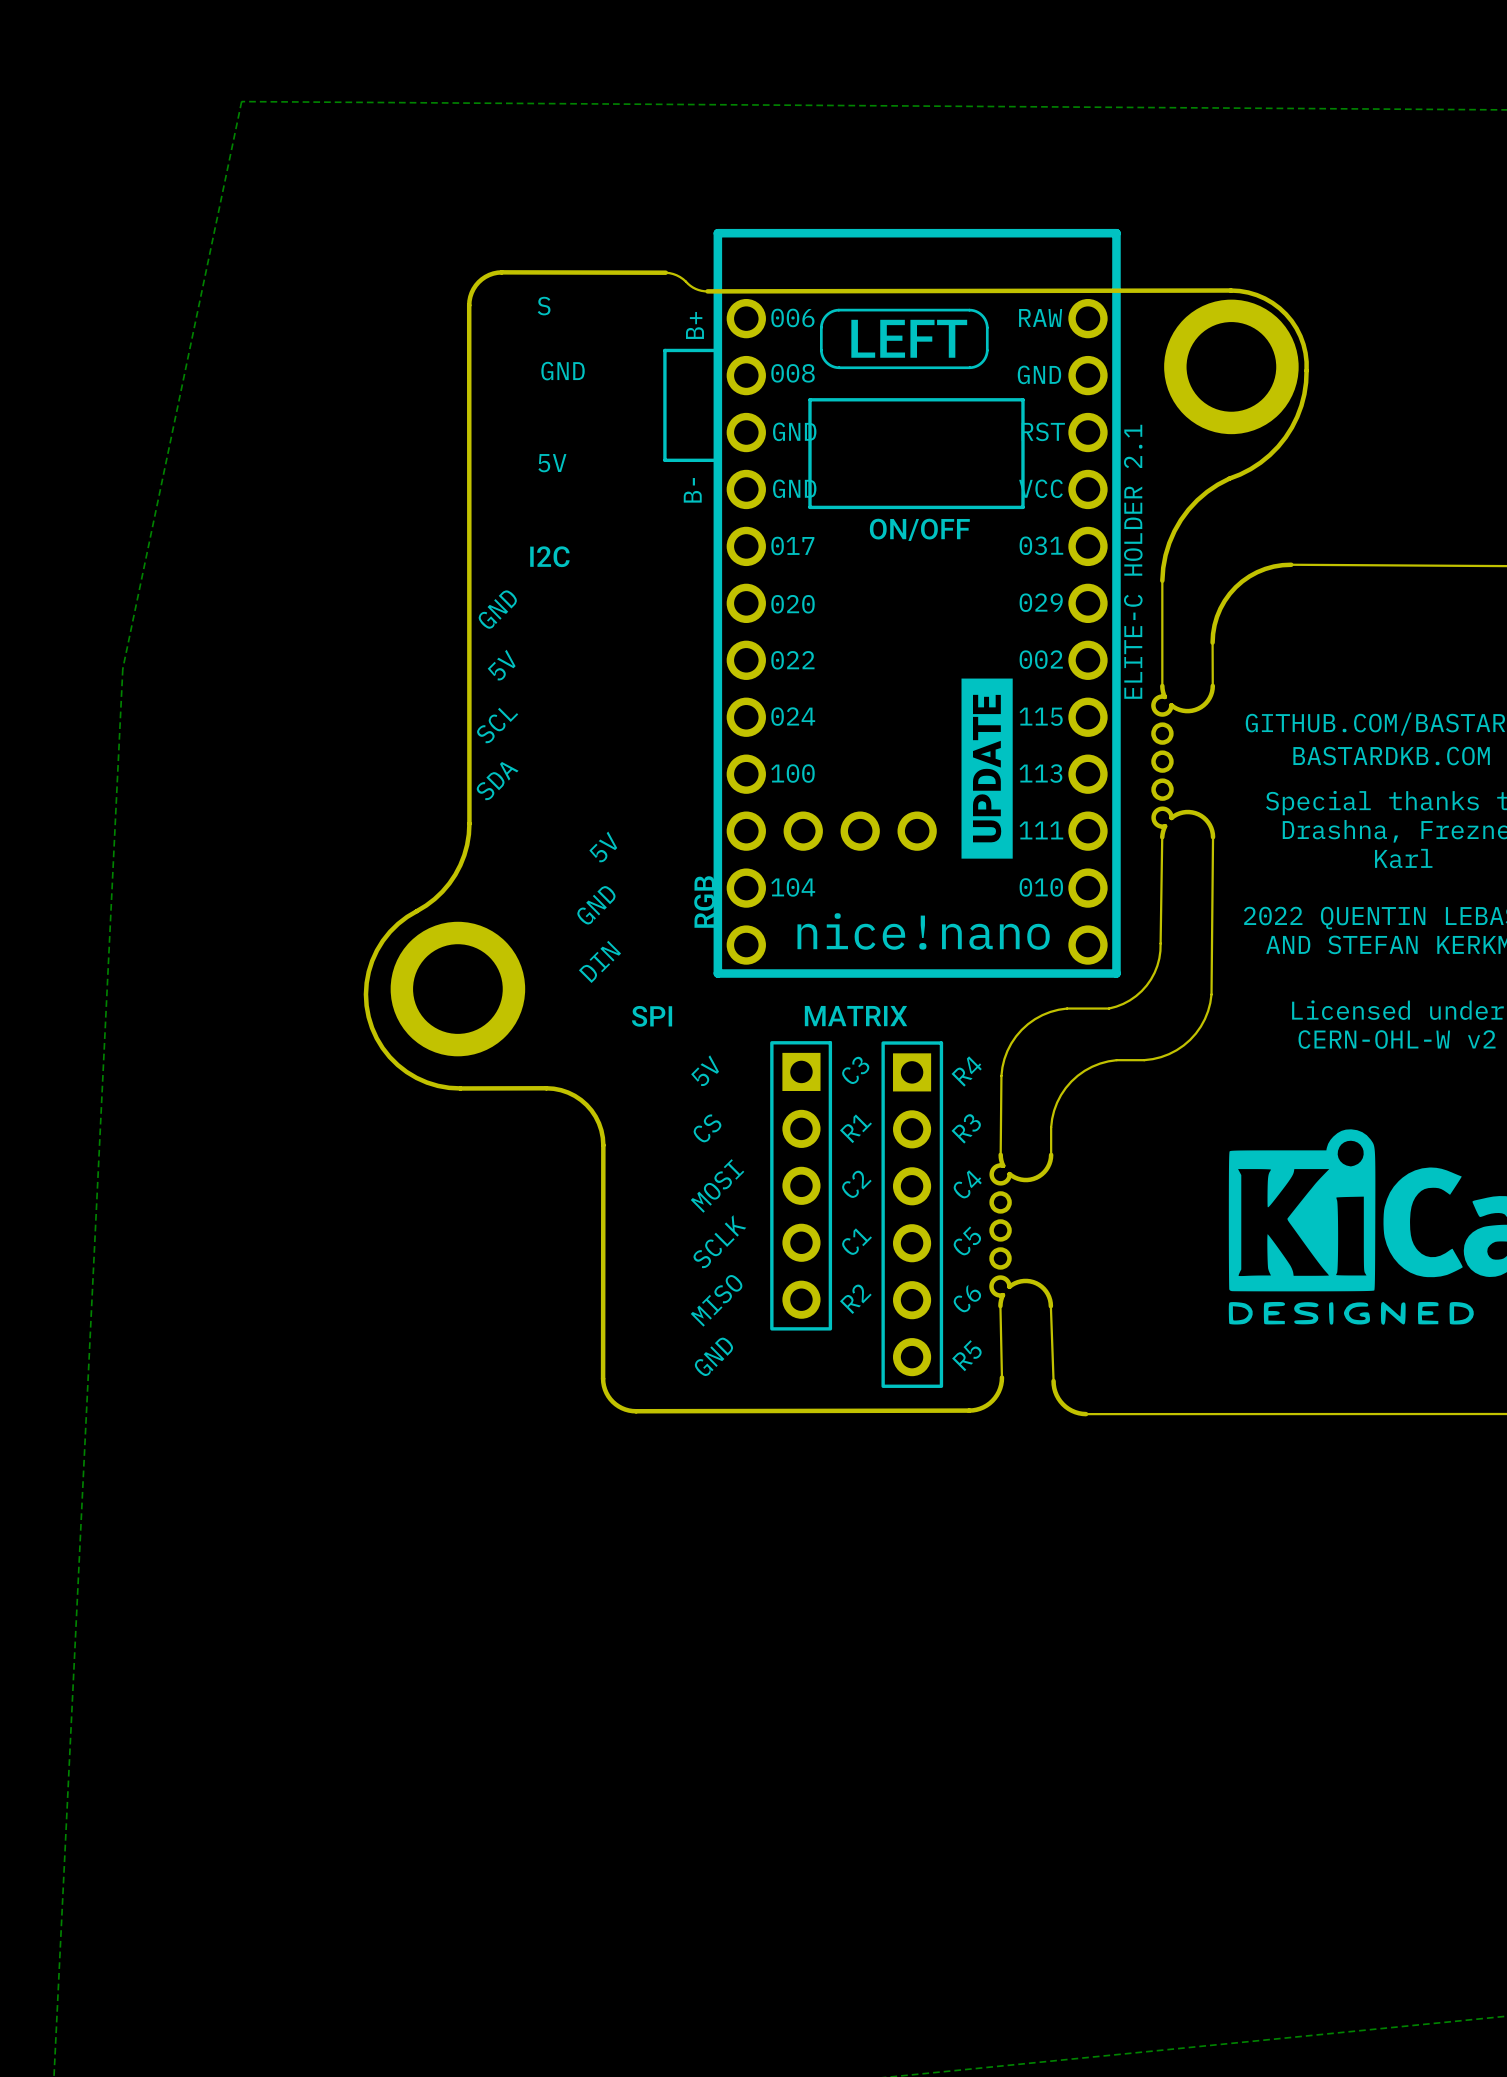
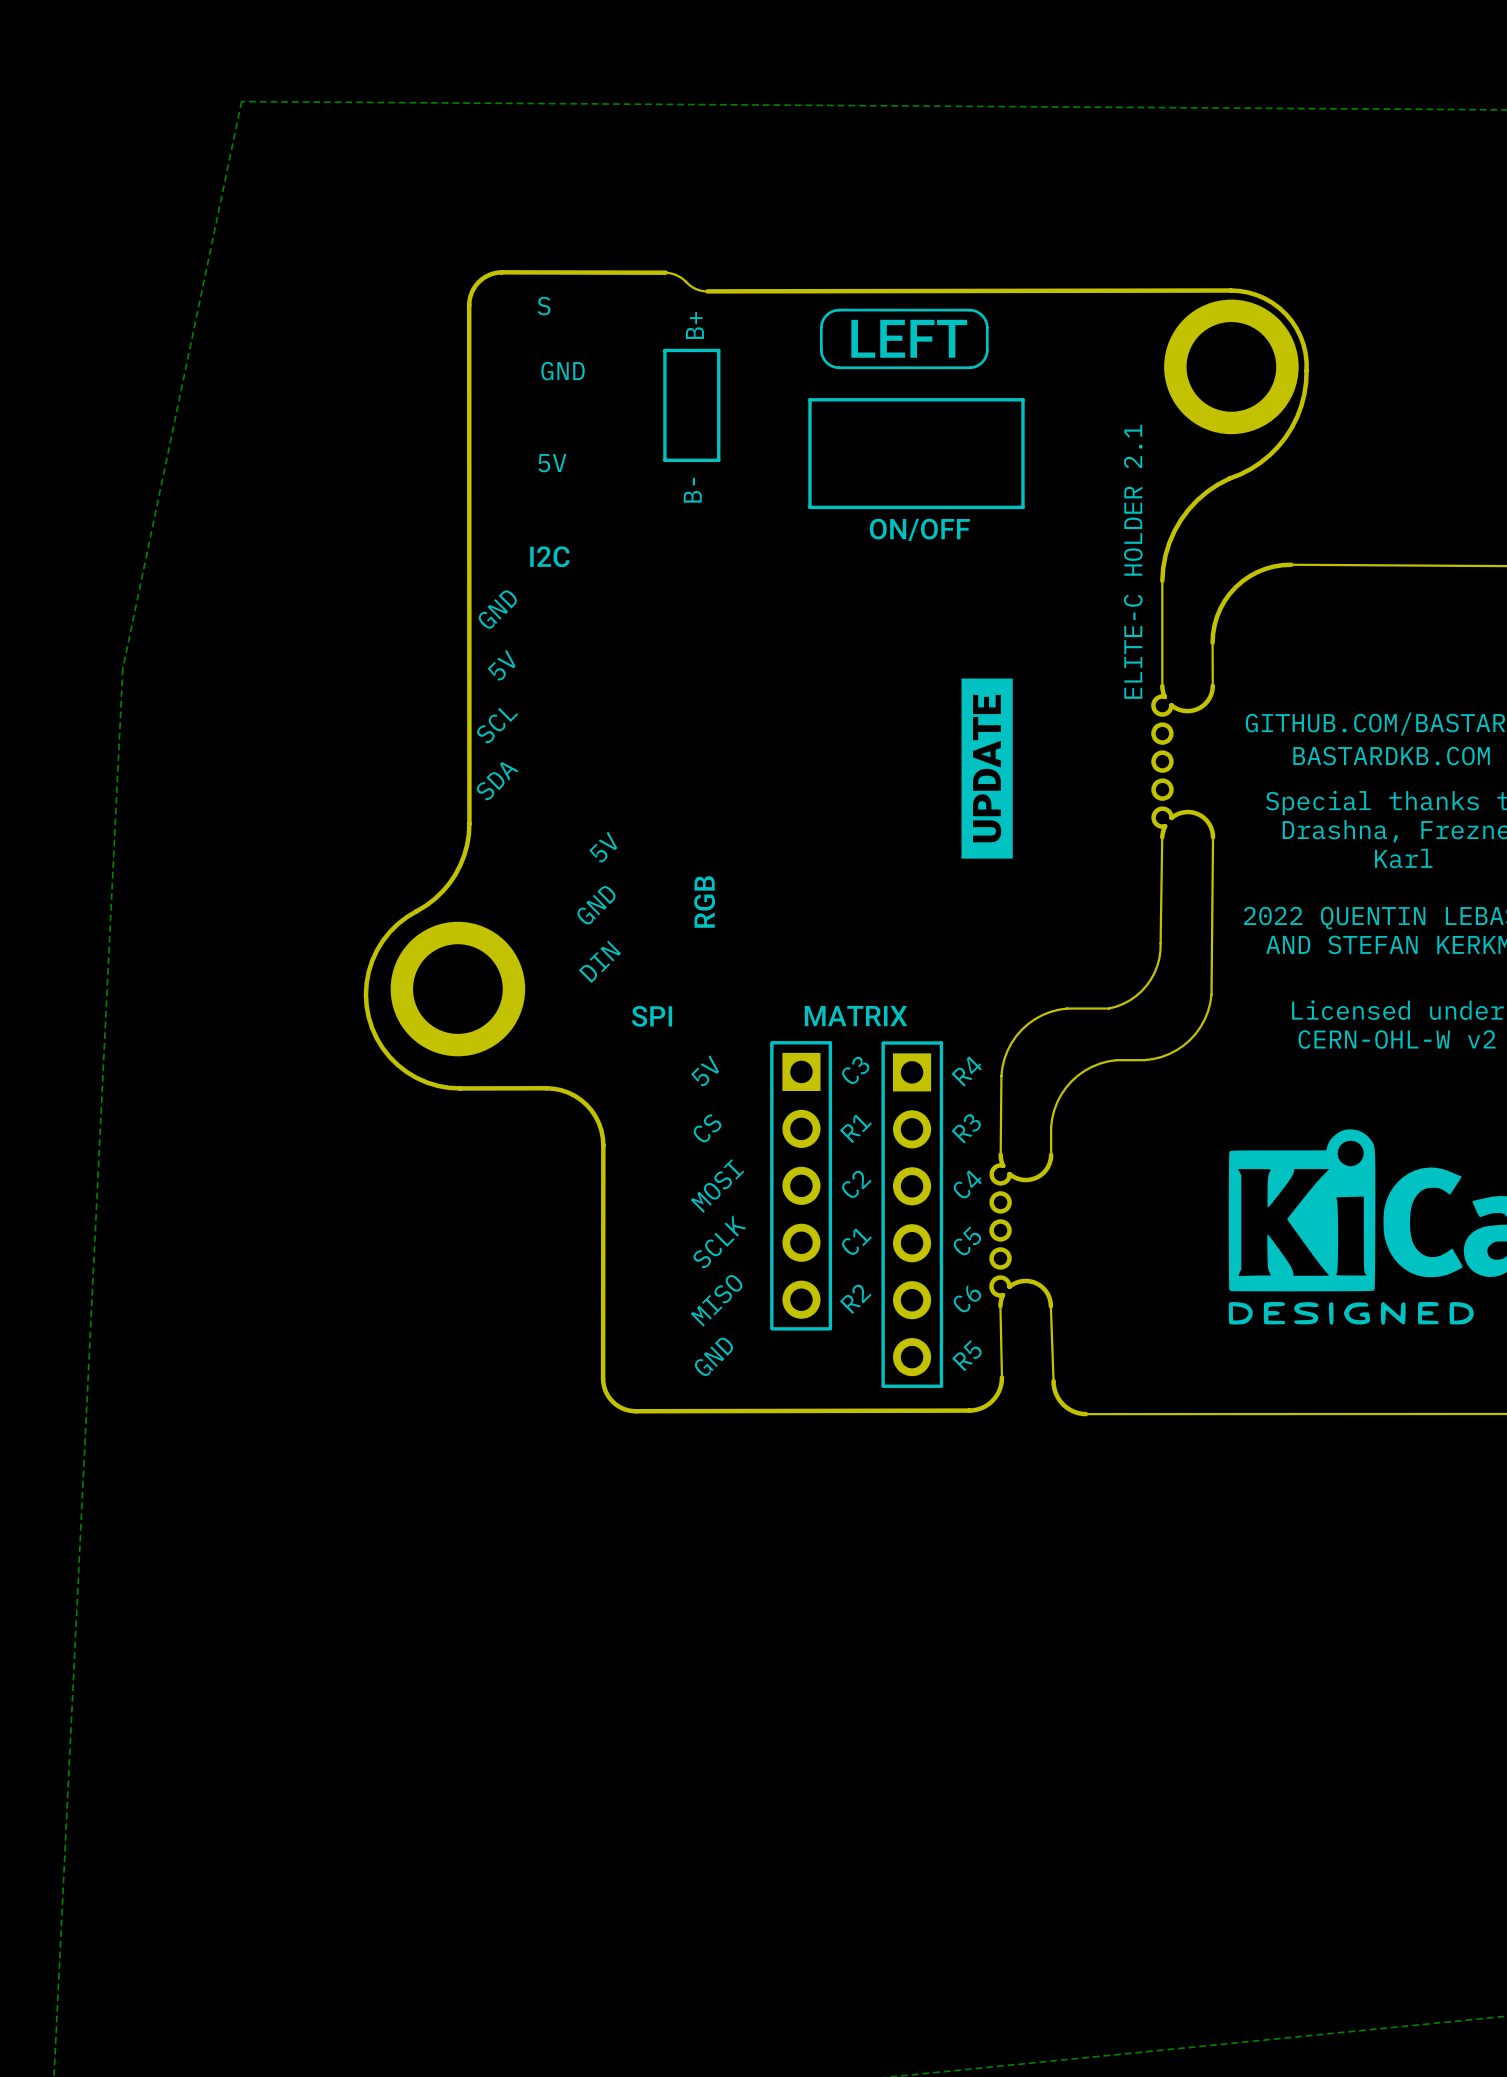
part: (917, 603) -> none

